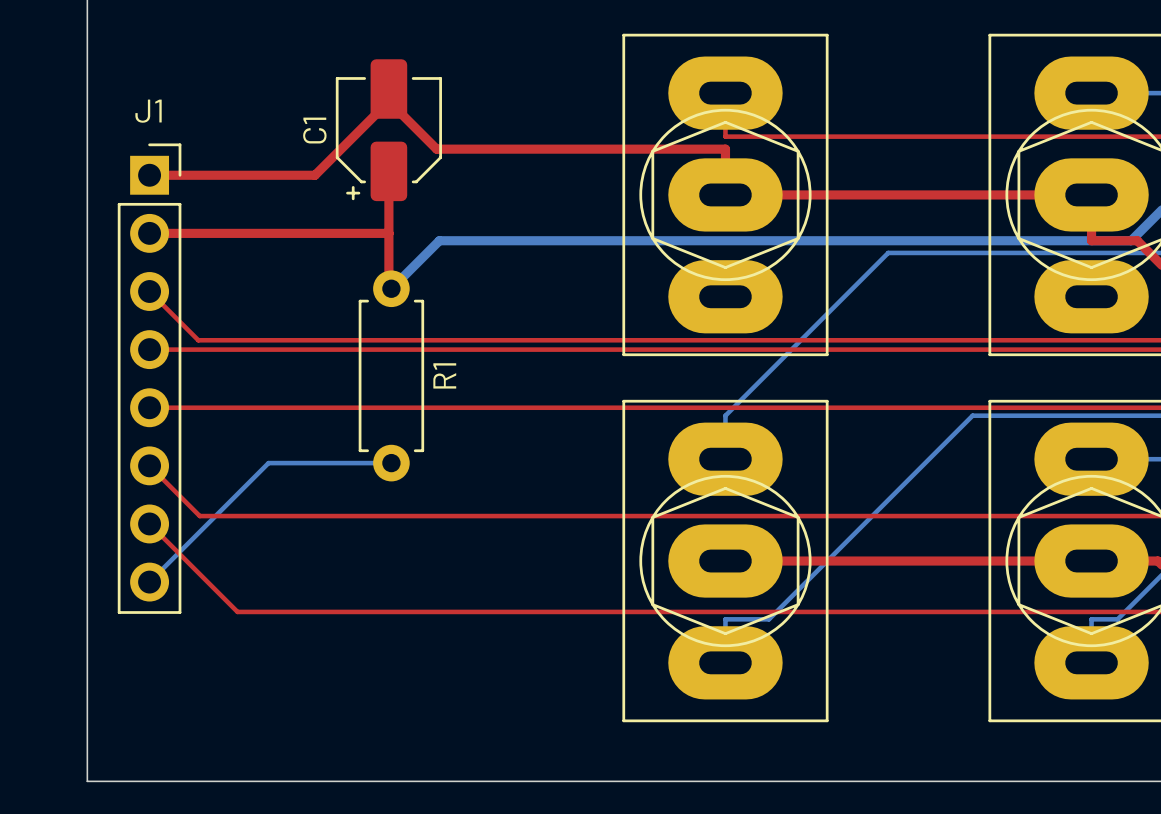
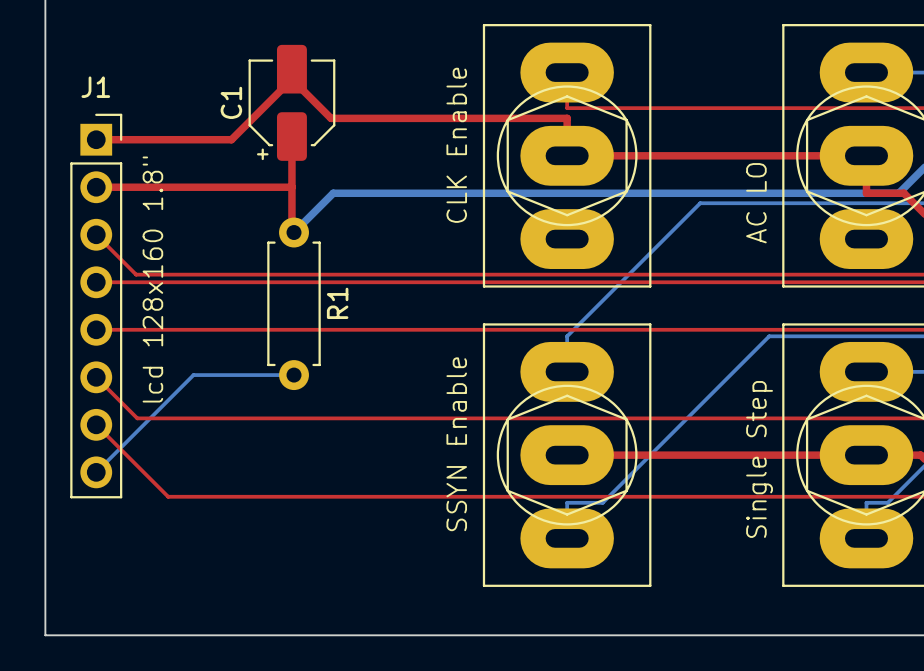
text: none -> CLK Enable (456, 145)
text: none -> AC LO (756, 203)
text: none -> lcd 128x160 1.8" (152, 279)
text: none -> SSYN Enable (456, 444)
text: none -> Single Step (759, 459)

